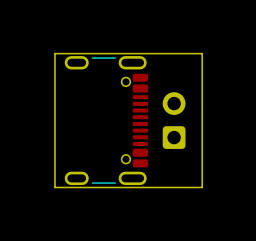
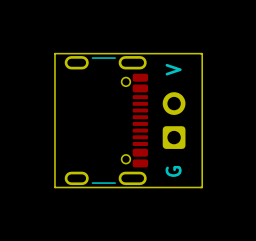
text: none -> V (173, 69)
text: none -> G (173, 171)

